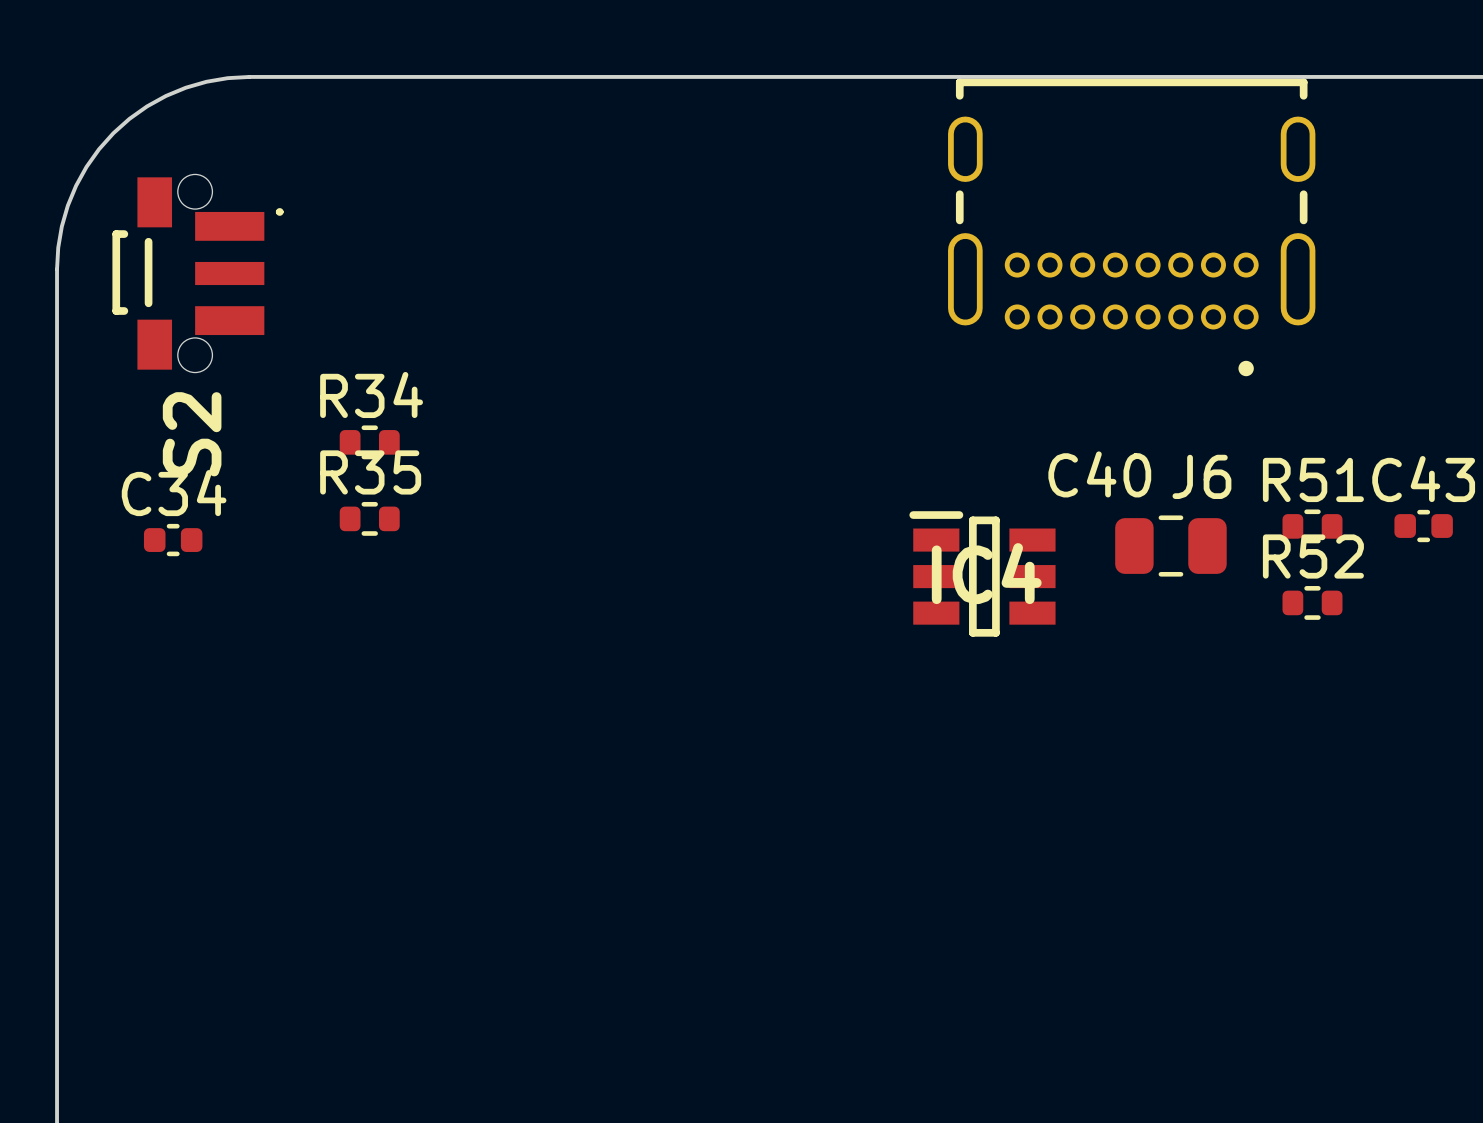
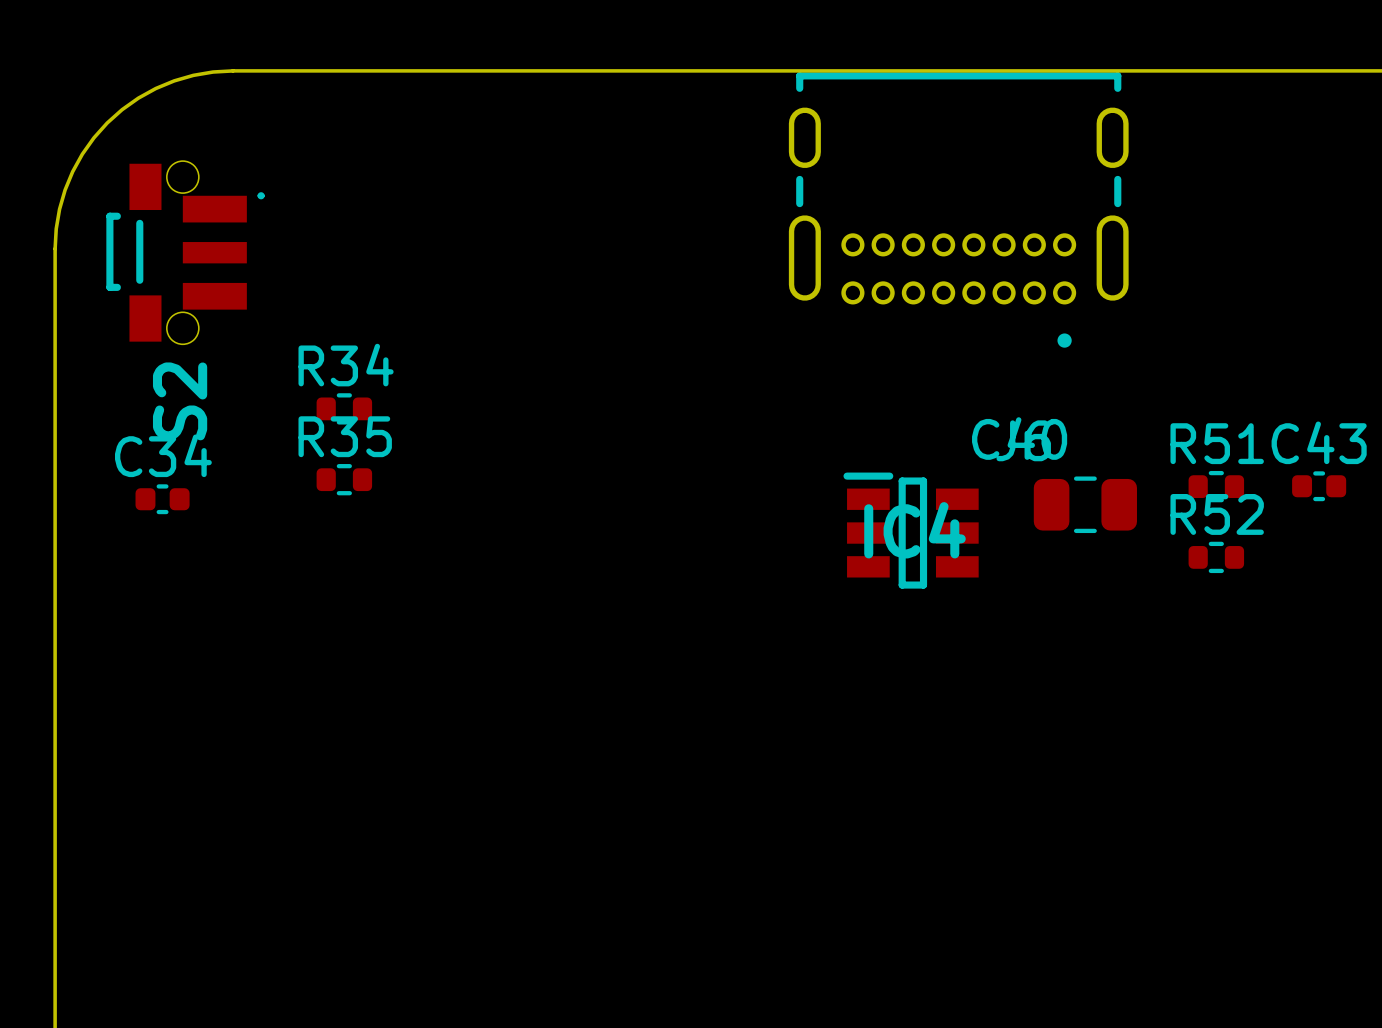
J6 position: (1131, 227) -> (958, 210)

